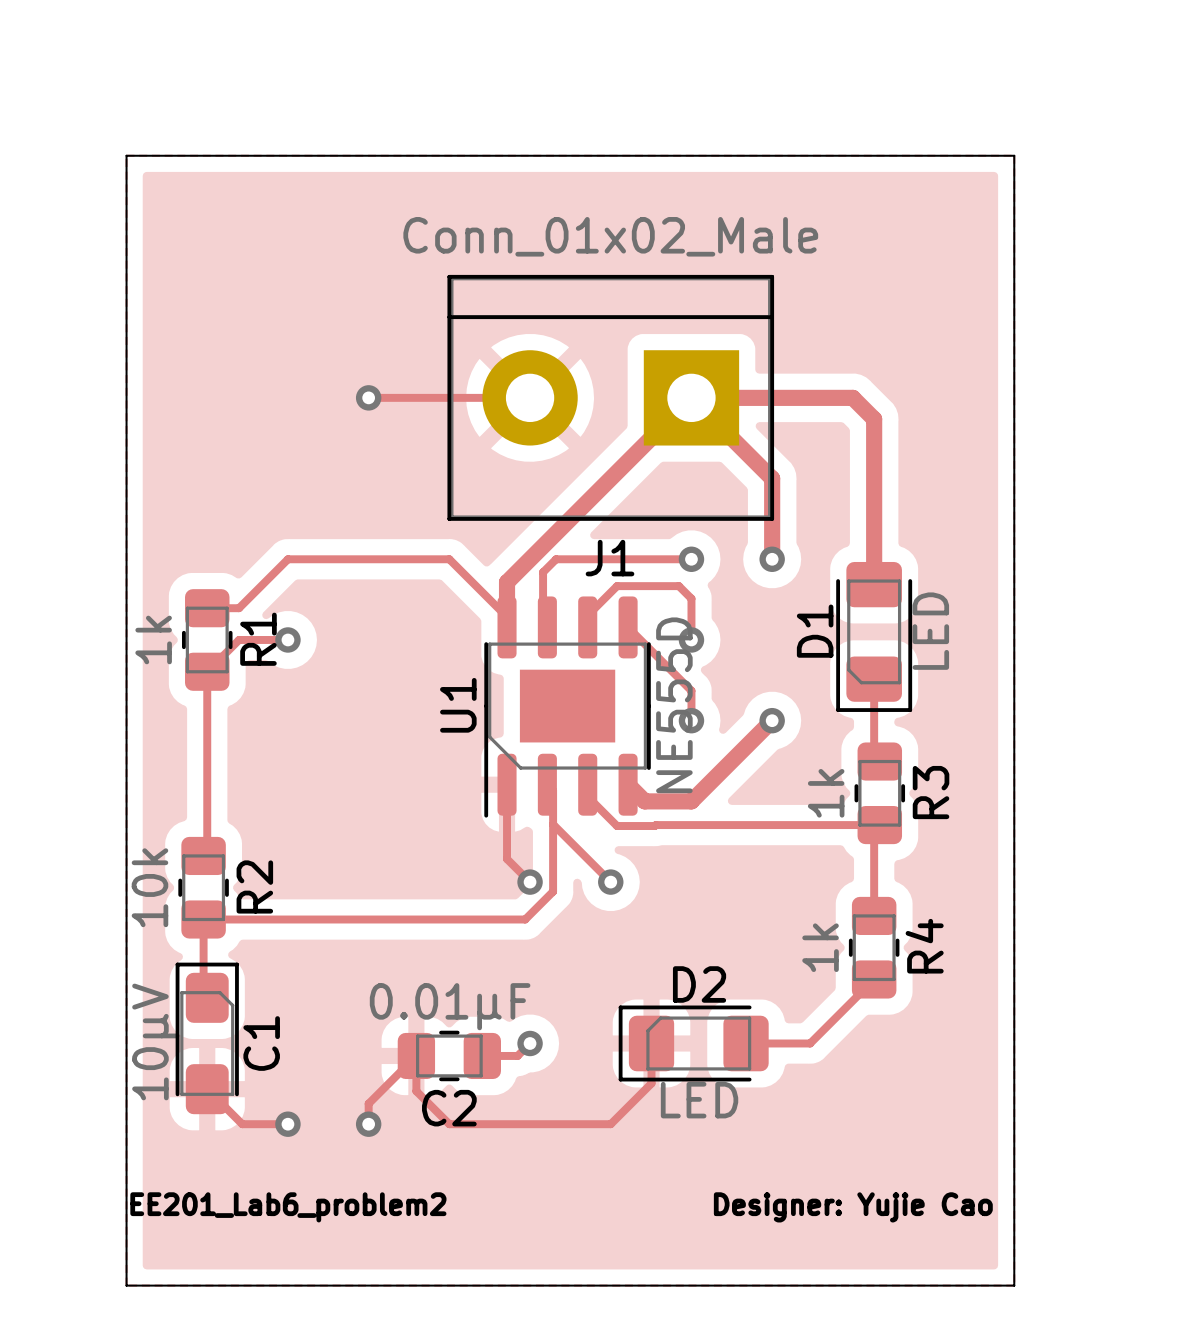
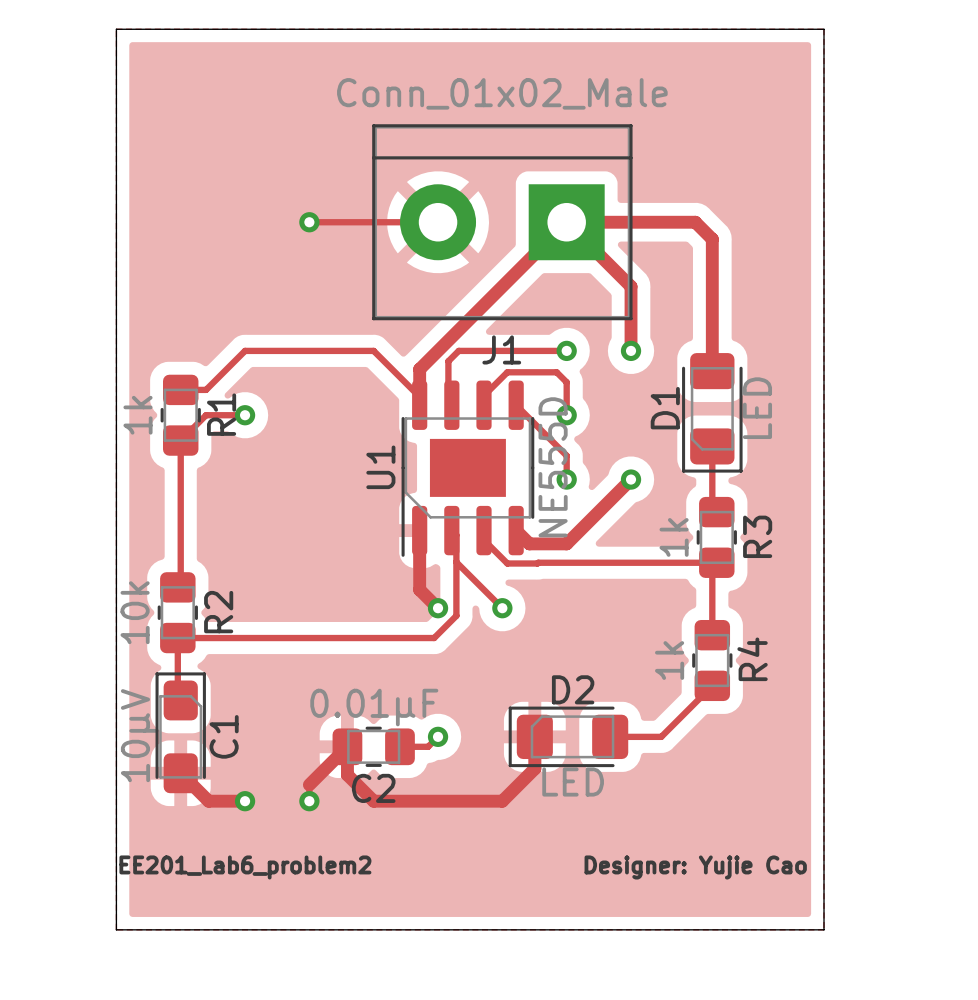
track width: thin (507, 784) (507, 859) (530, 882) -> thick (419, 530) (419, 589) (438, 608)
track width: thin (651, 1043) (651, 1083) (610, 1124) (449, 1124) (416, 1091) (416, 1055) (368, 1103) -> thick (534, 736) (534, 768) (502, 801) (373, 801) (347, 774) (347, 746) (309, 784)
track width: thin (207, 1089) (242, 1124) (287, 1124) -> thick (180, 773) (208, 801) (245, 801)

